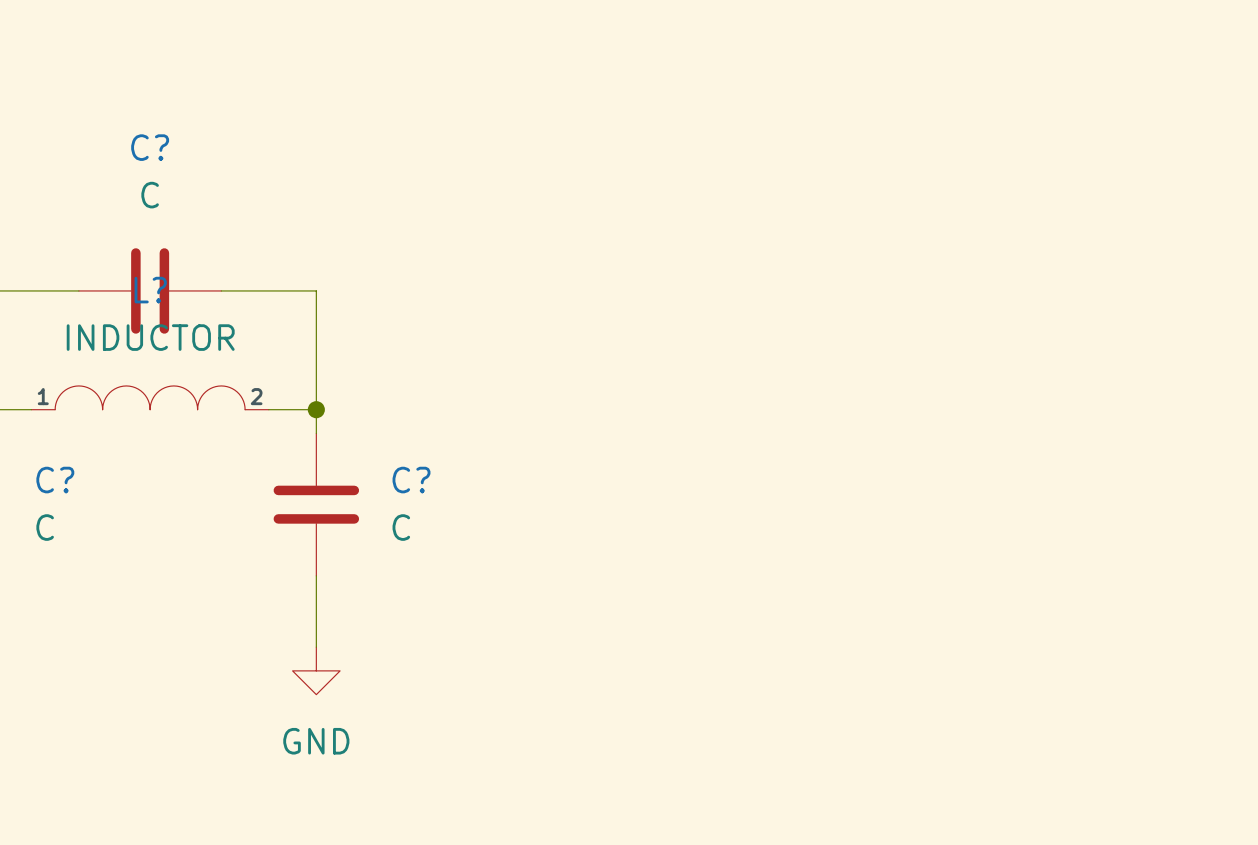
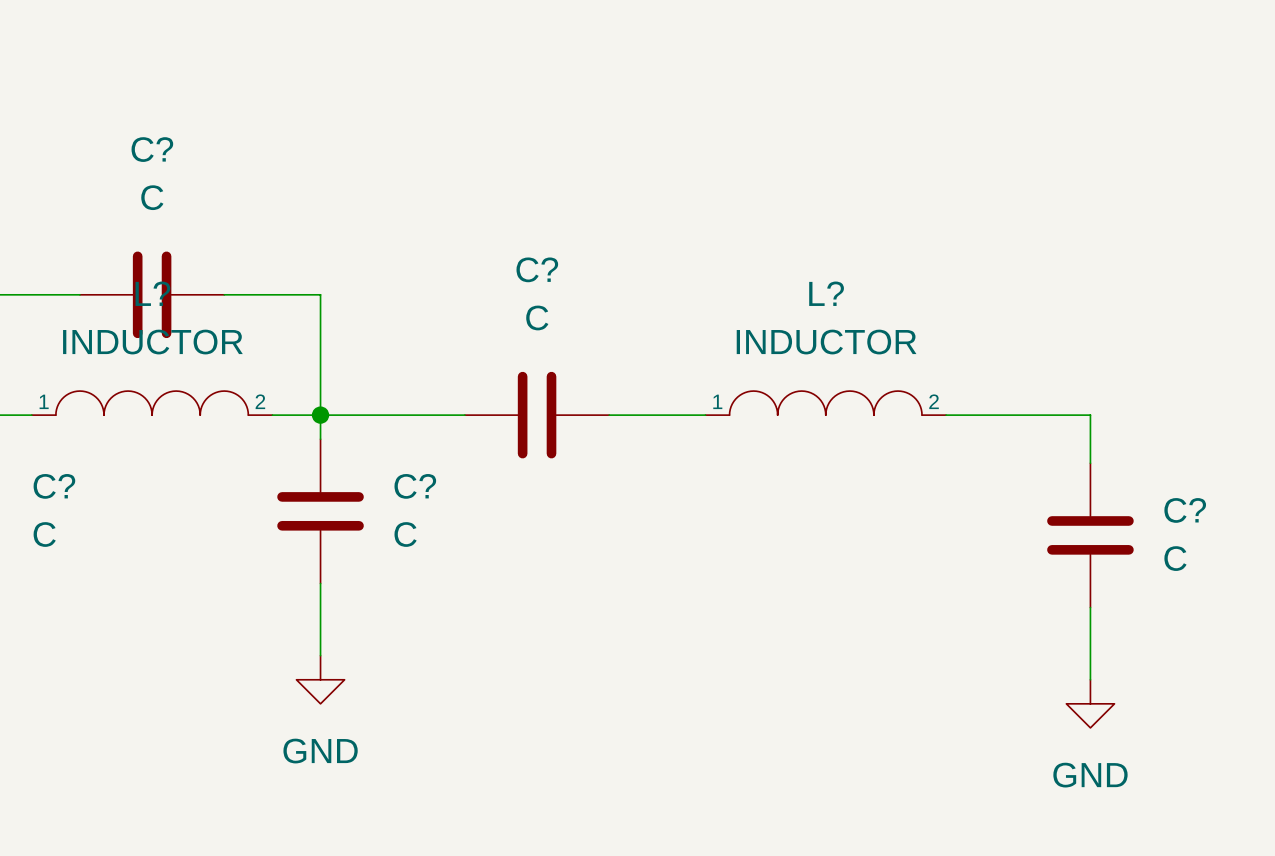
L?: none -> INDUCTOR (825, 403)
wire: none -> (320, 415) (464, 415)
C?: none -> C (537, 415)
wire: none -> (609, 415) (705, 415)
wire: none -> (946, 415) (1090, 415) (1090, 463)
C?: none -> C (1090, 535)
wire: none -> (1090, 607) (1090, 679)
power symbol: none -> GND (1090, 703)

